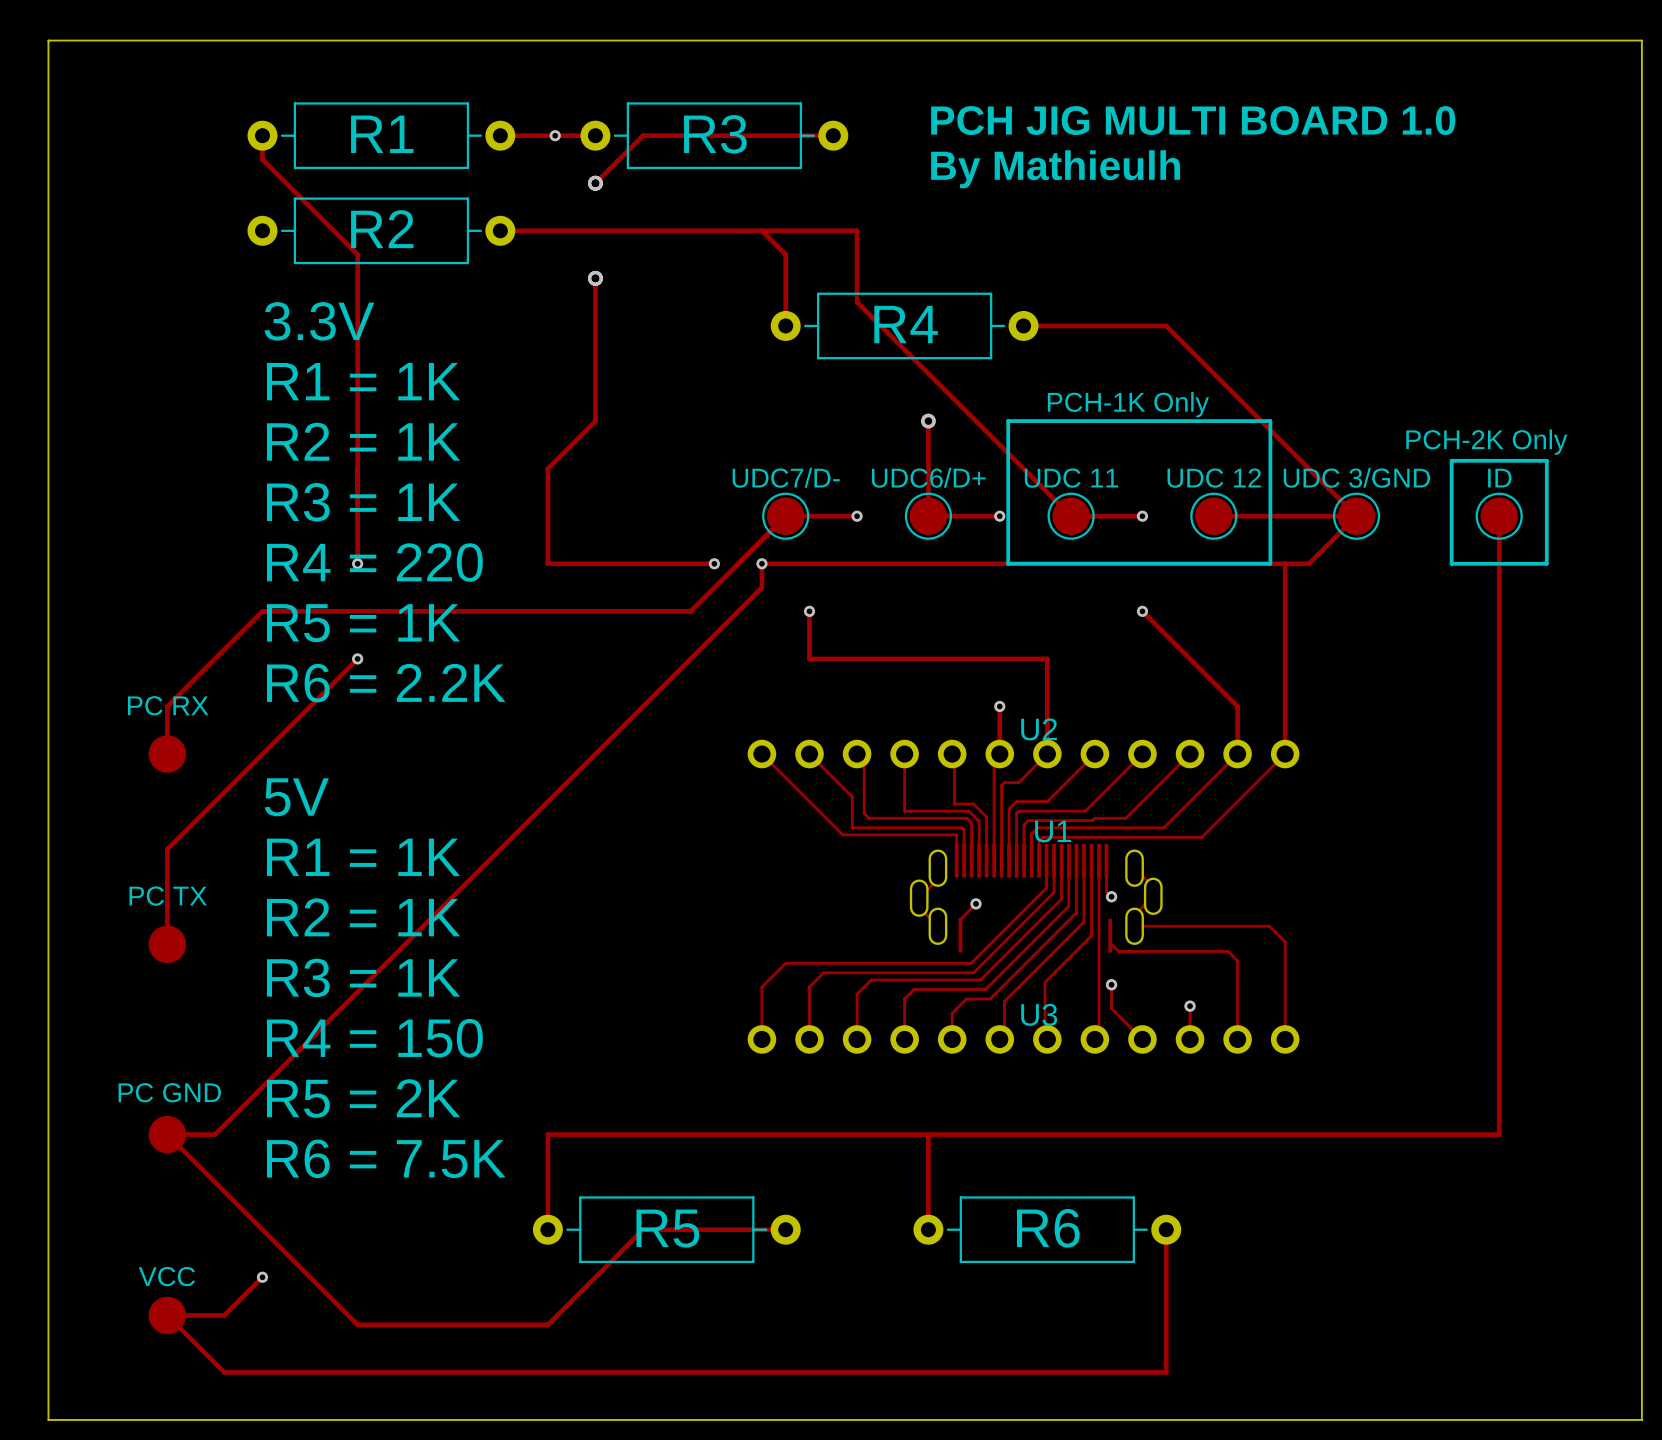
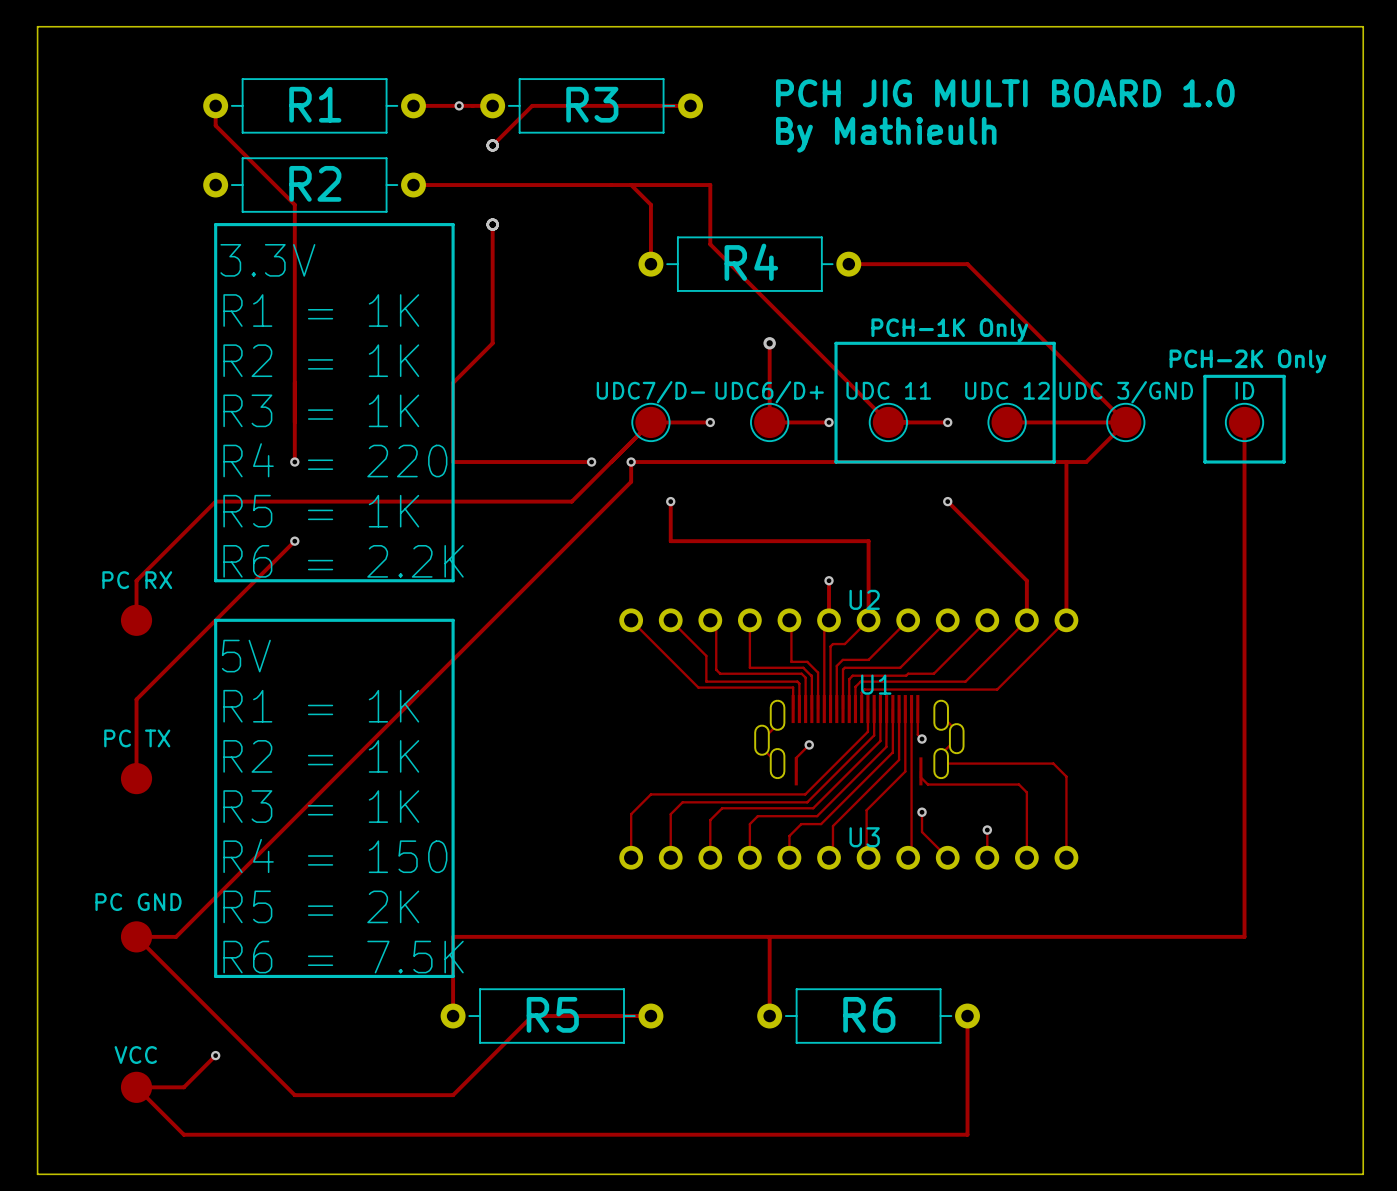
line: none -> (215, 224) (215, 580) (453, 580) (453, 224) (215, 224)
line: none -> (215, 620) (453, 620) (453, 976) (215, 976) (215, 620)

